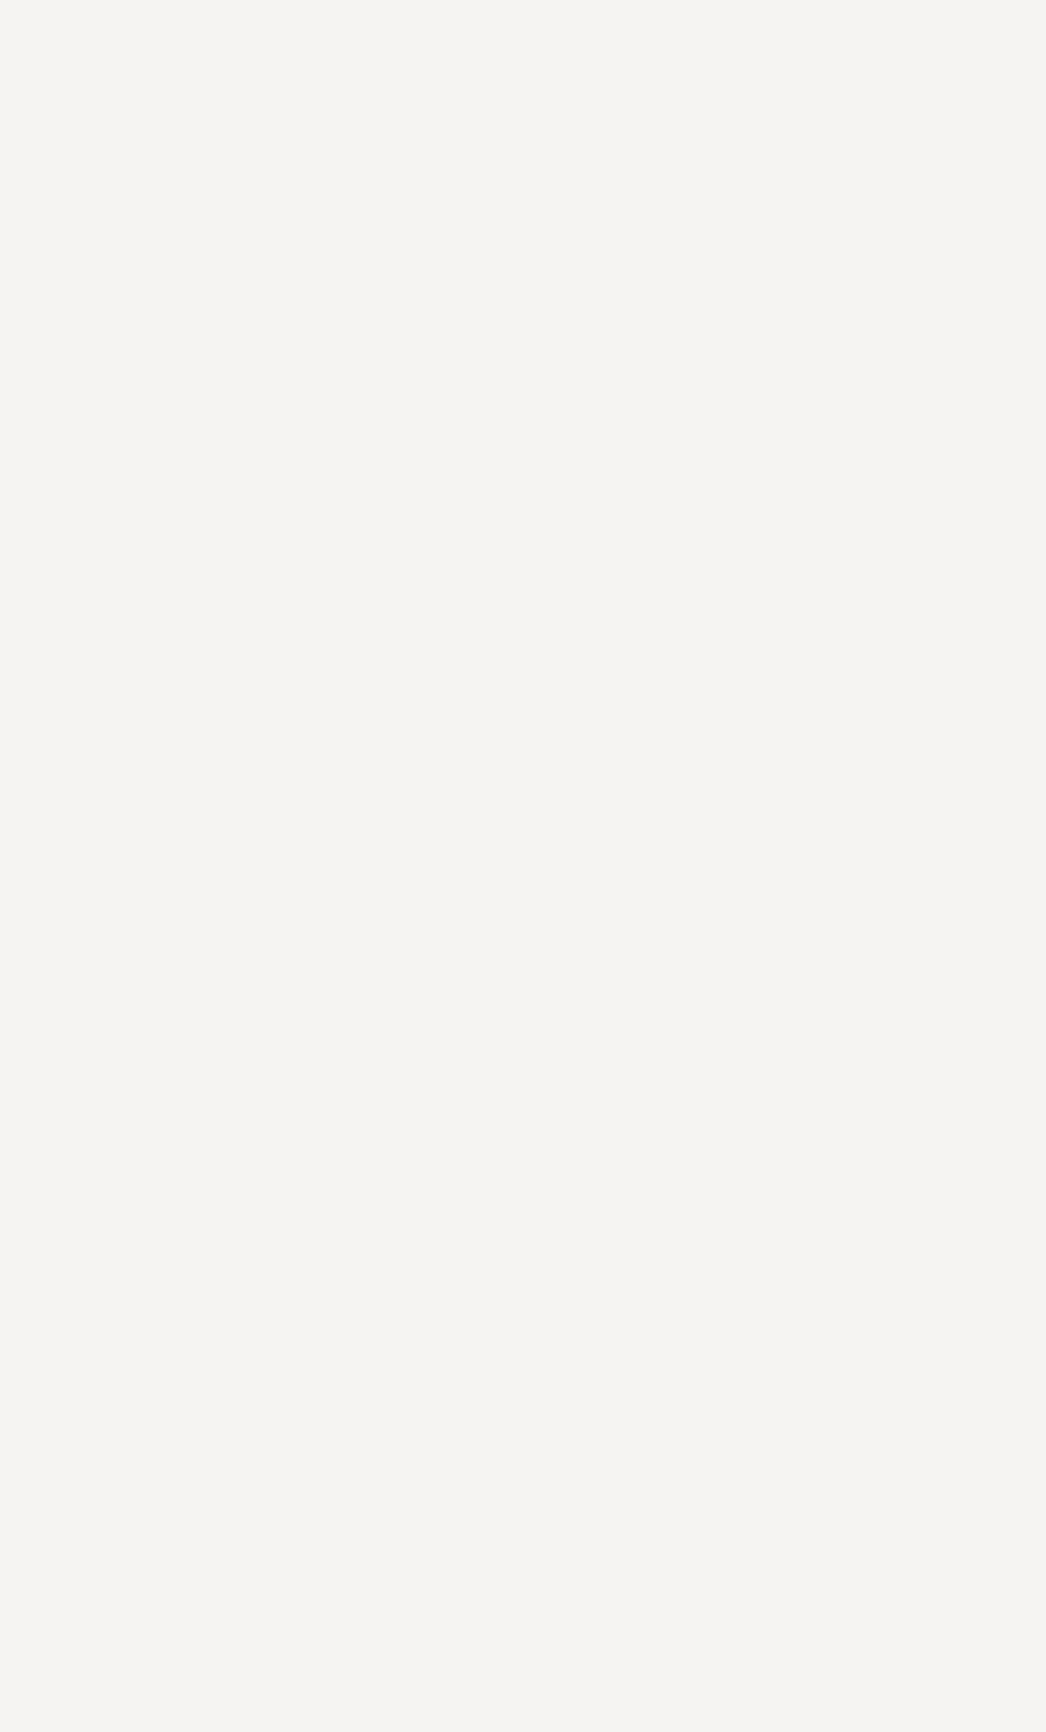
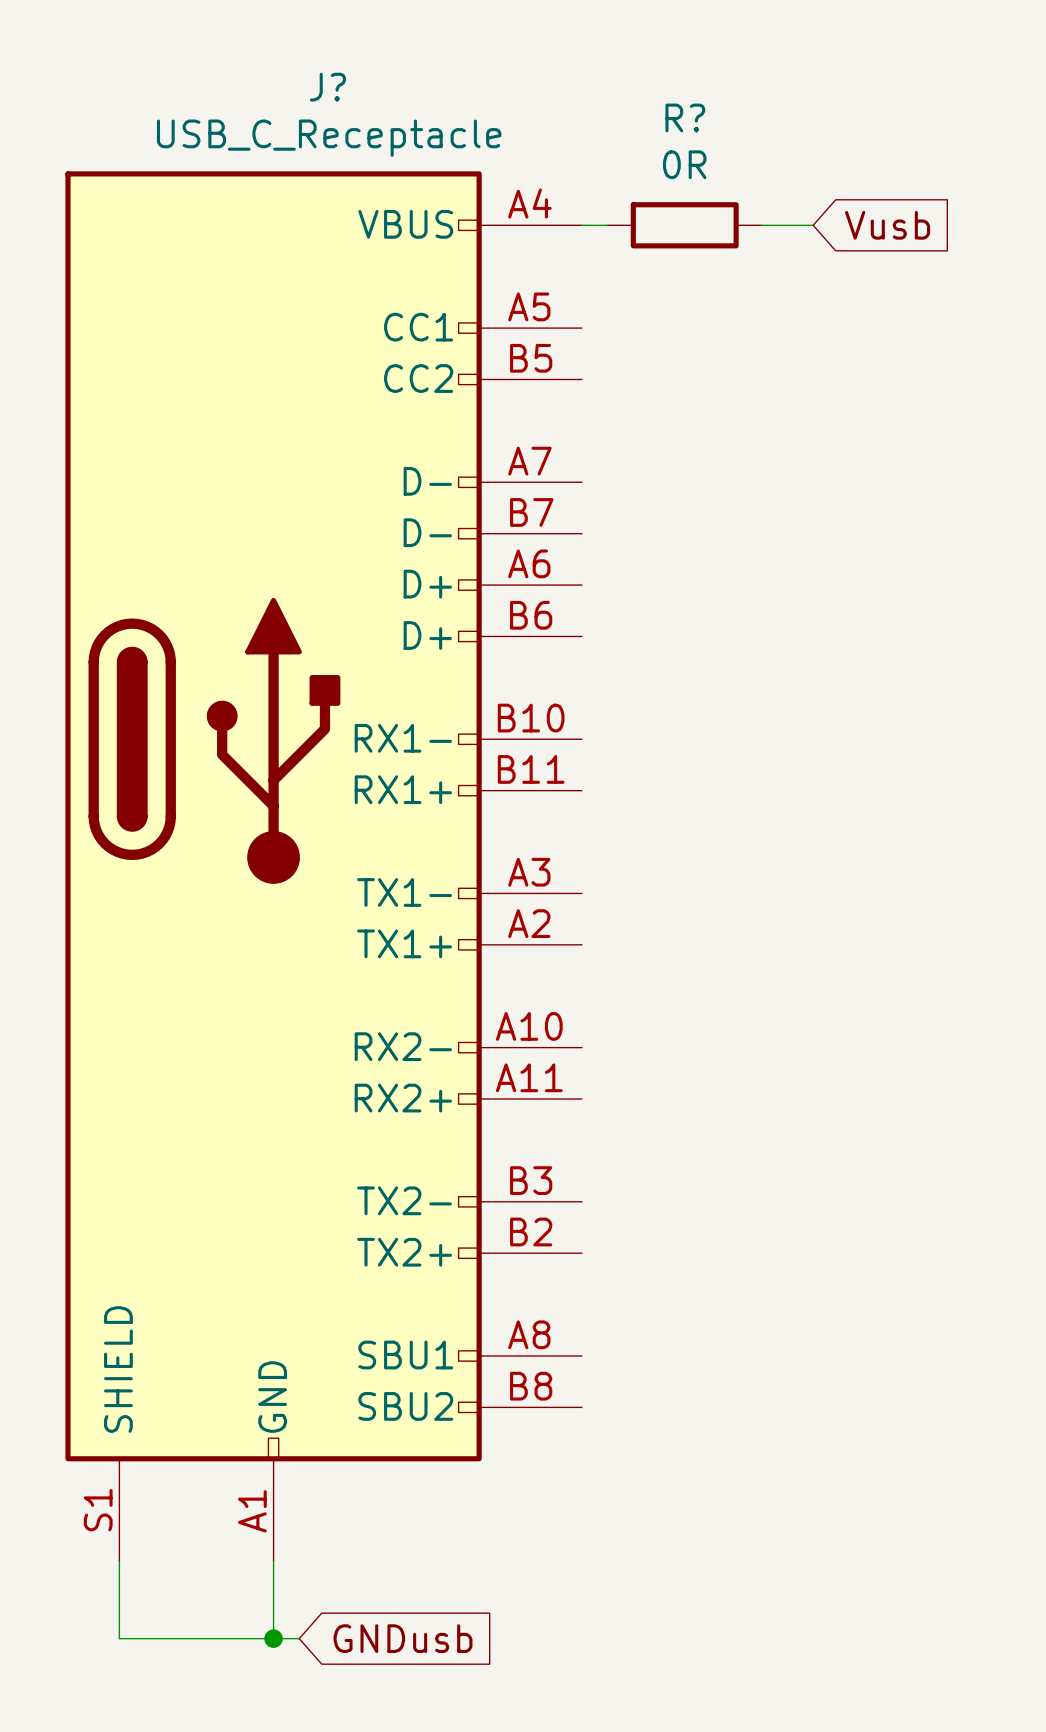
wire: none -> (581, 225) (607, 225)
R?: none -> 0R (684, 225)
wire: none -> (761, 225) (813, 225)
global label: none -> Vusb (887, 225)
J?: none -> USB_C_Receptacle (323, 866)
wire: none -> (119, 1561) (119, 1638) (299, 1638)
wire: none -> (273, 1561) (273, 1638)
junction: none -> (273, 1638)
global label: none -> GNDusb (403, 1638)

